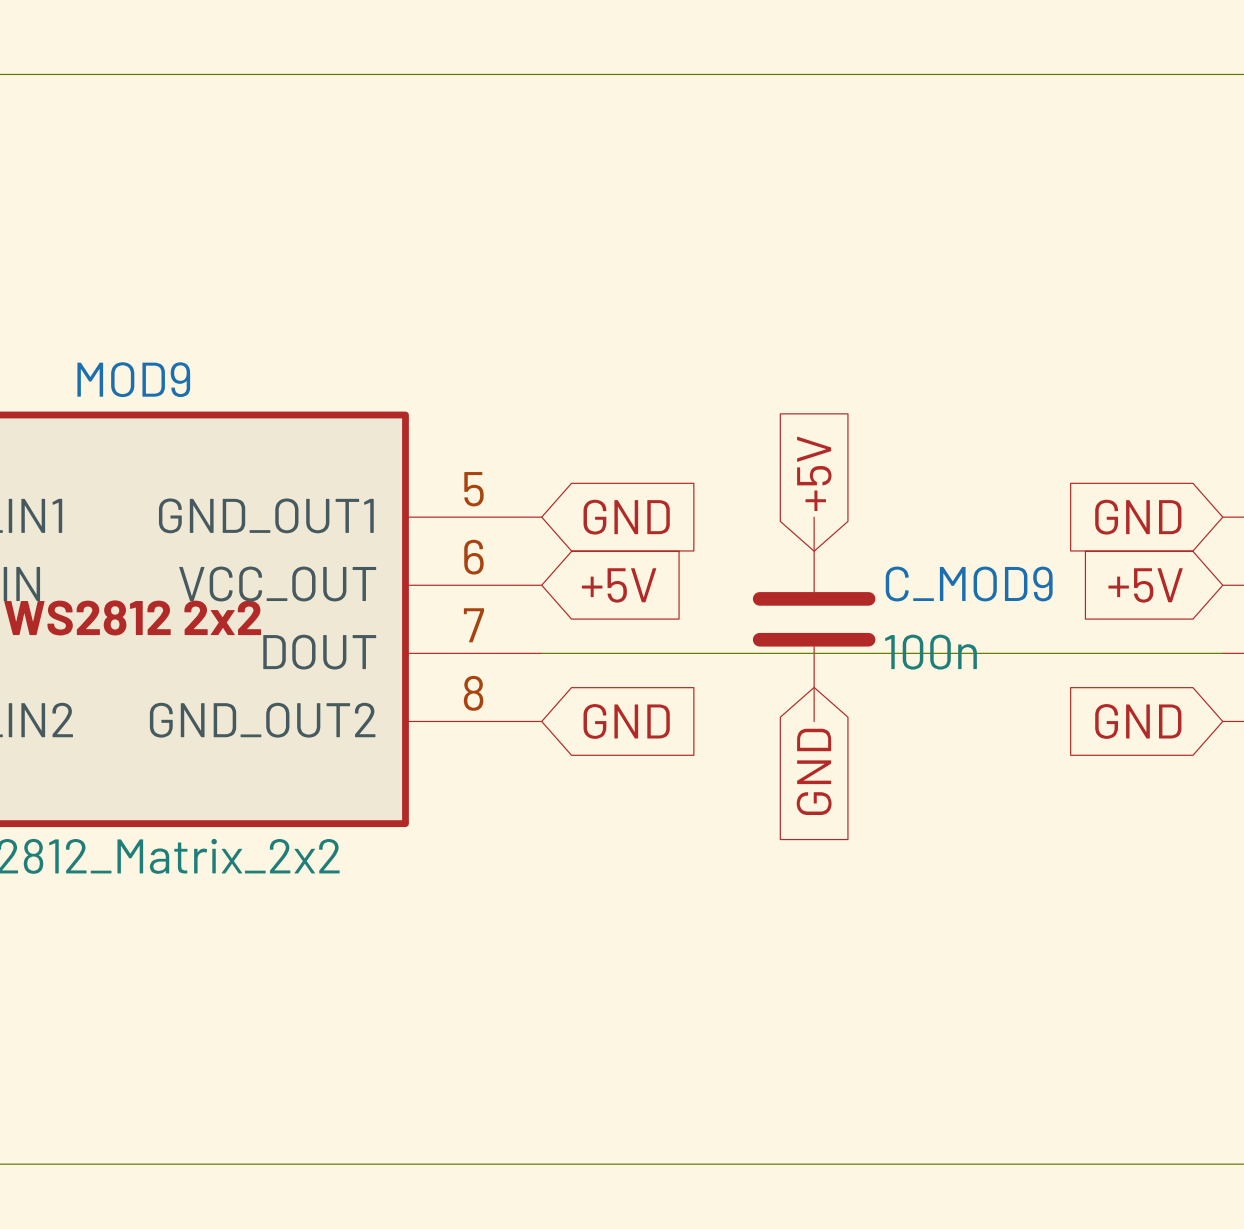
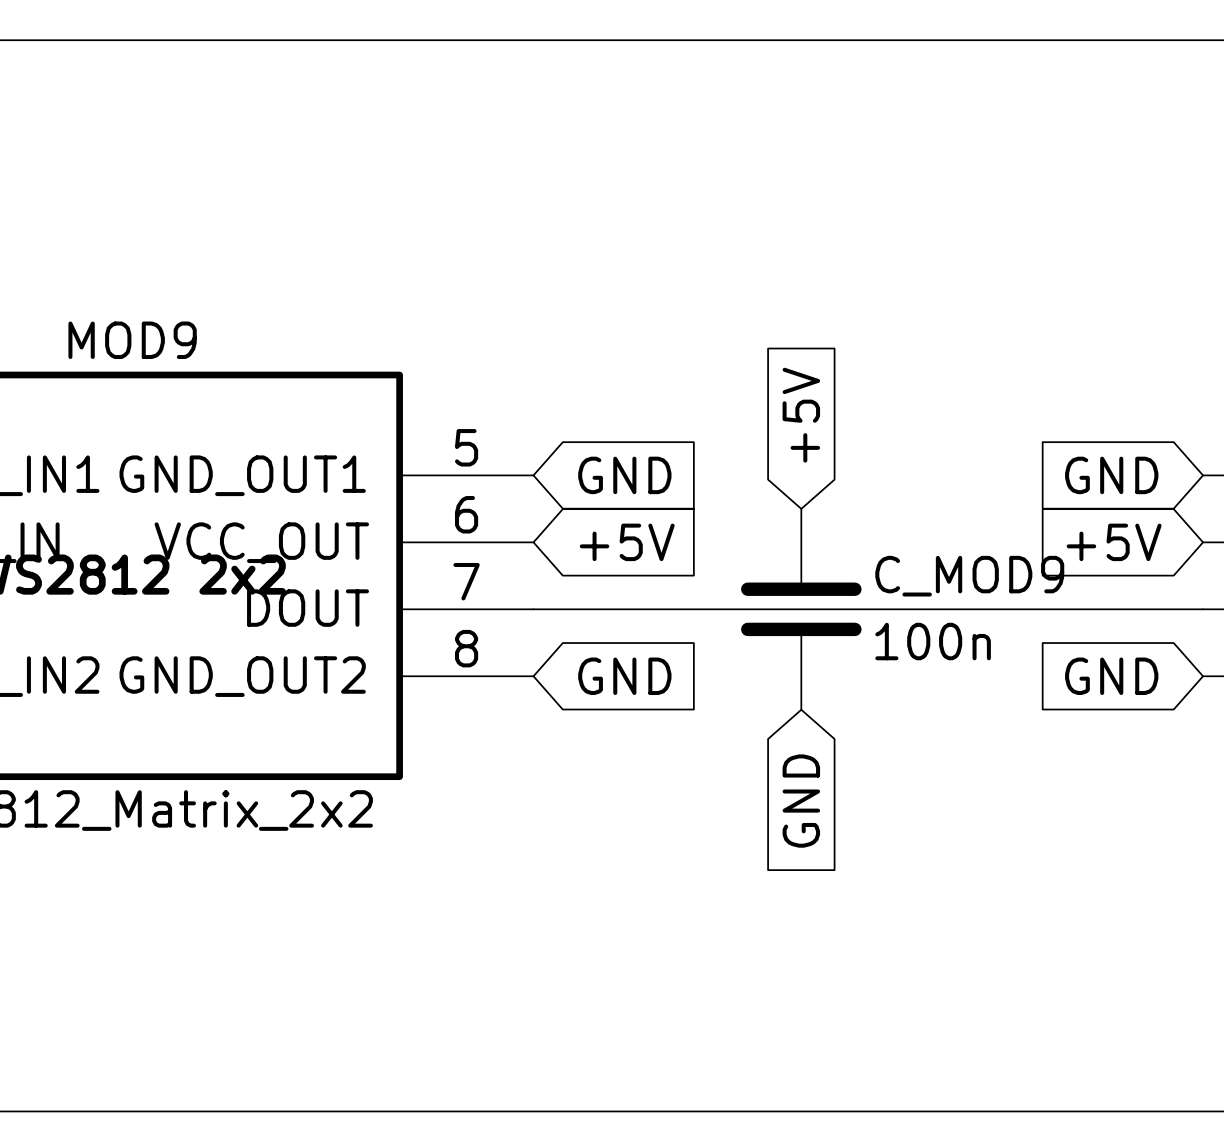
C_MOD9 position: (814, 619) -> (801, 609)
global label position: GND (814, 771) -> GND (801, 801)

